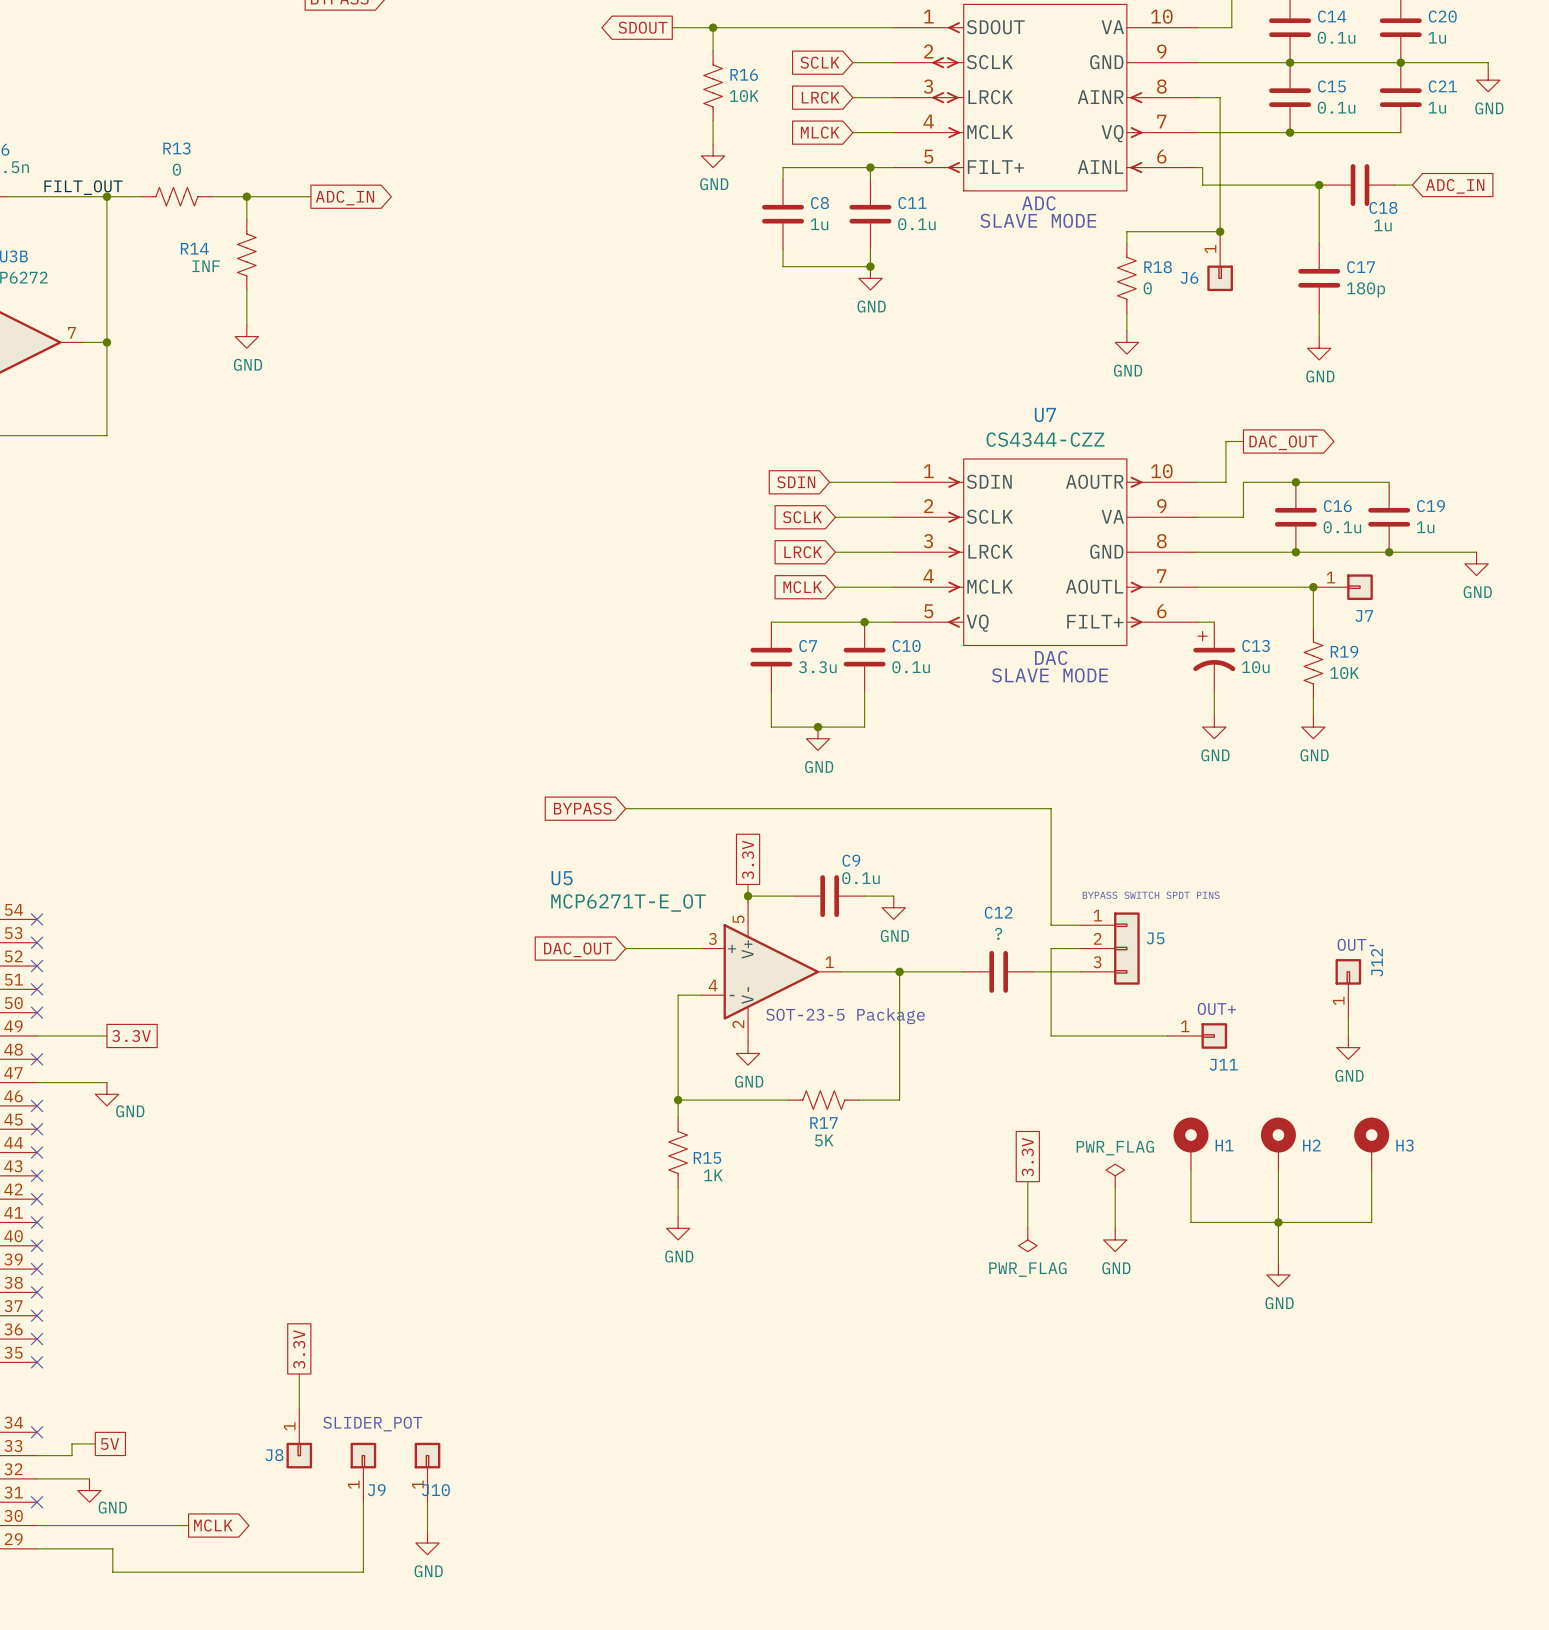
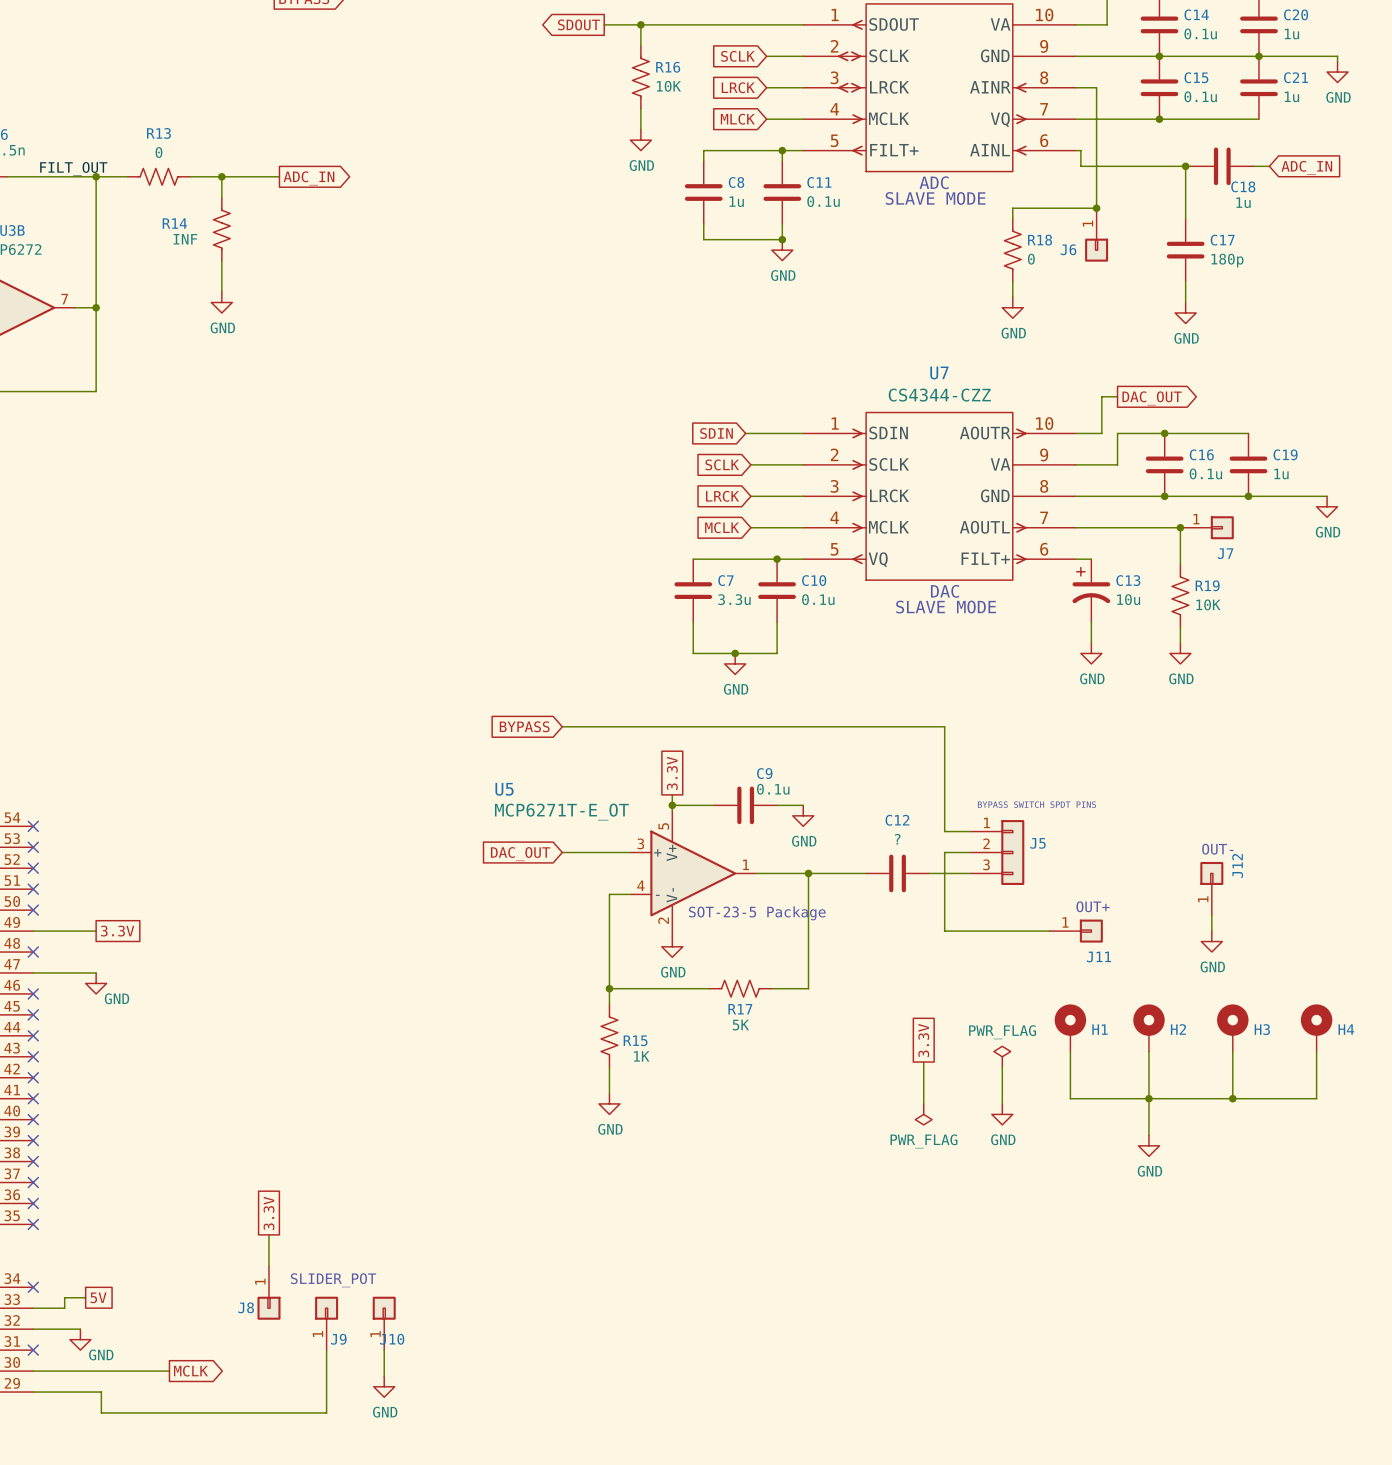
H4: none -> (1316, 1027)
wire: none -> (1316, 1051) (1316, 1098) (1232, 1098)
junction: none -> (1232, 1098)

